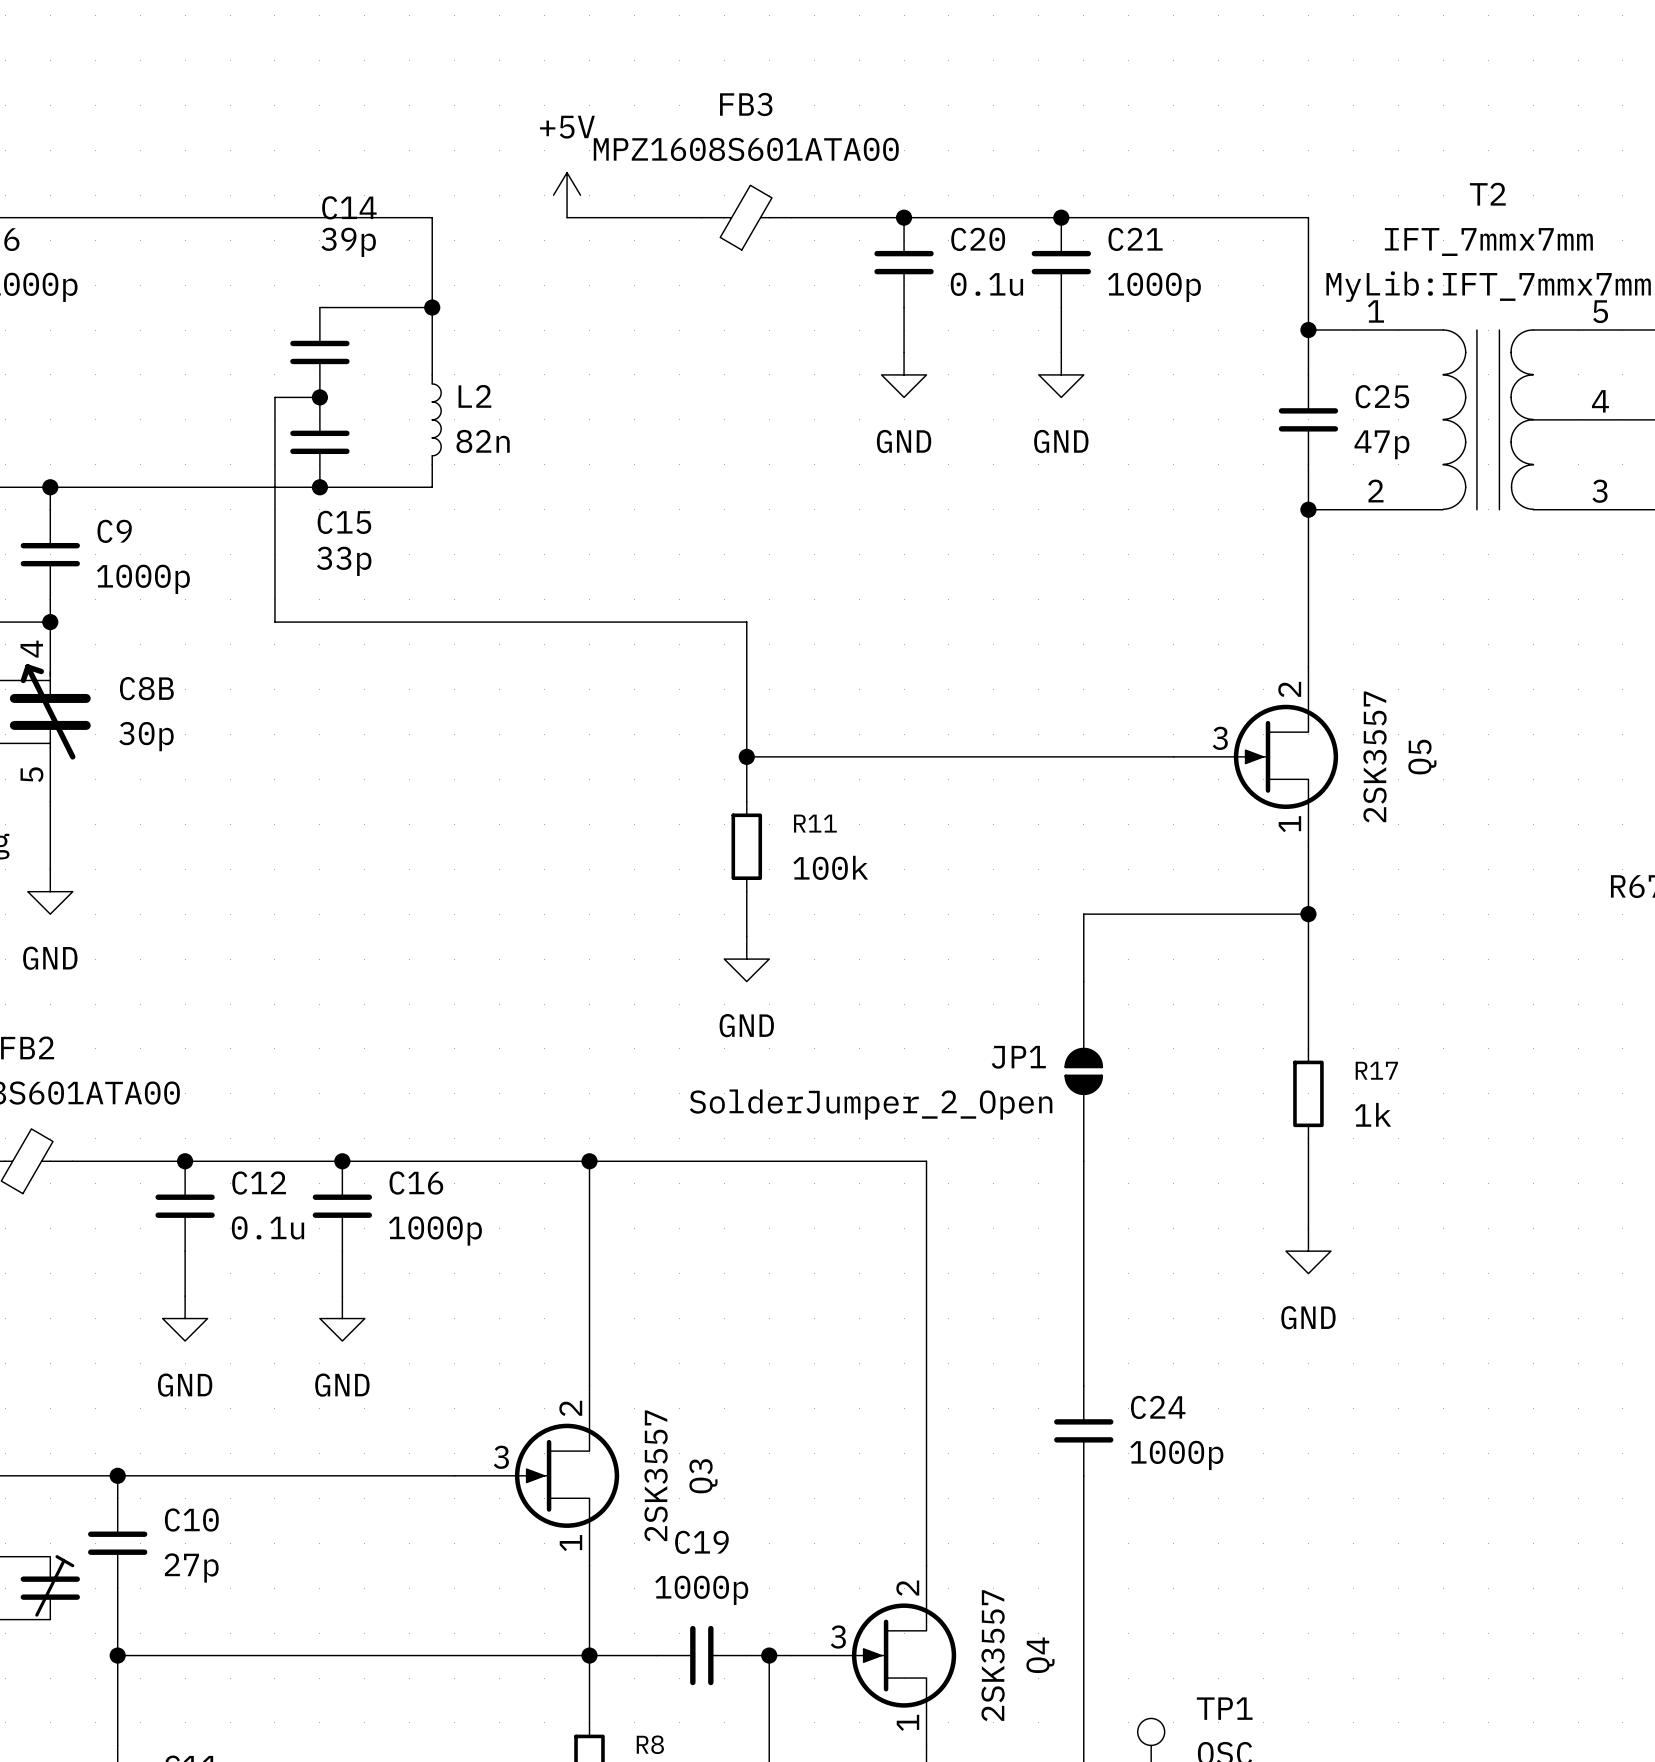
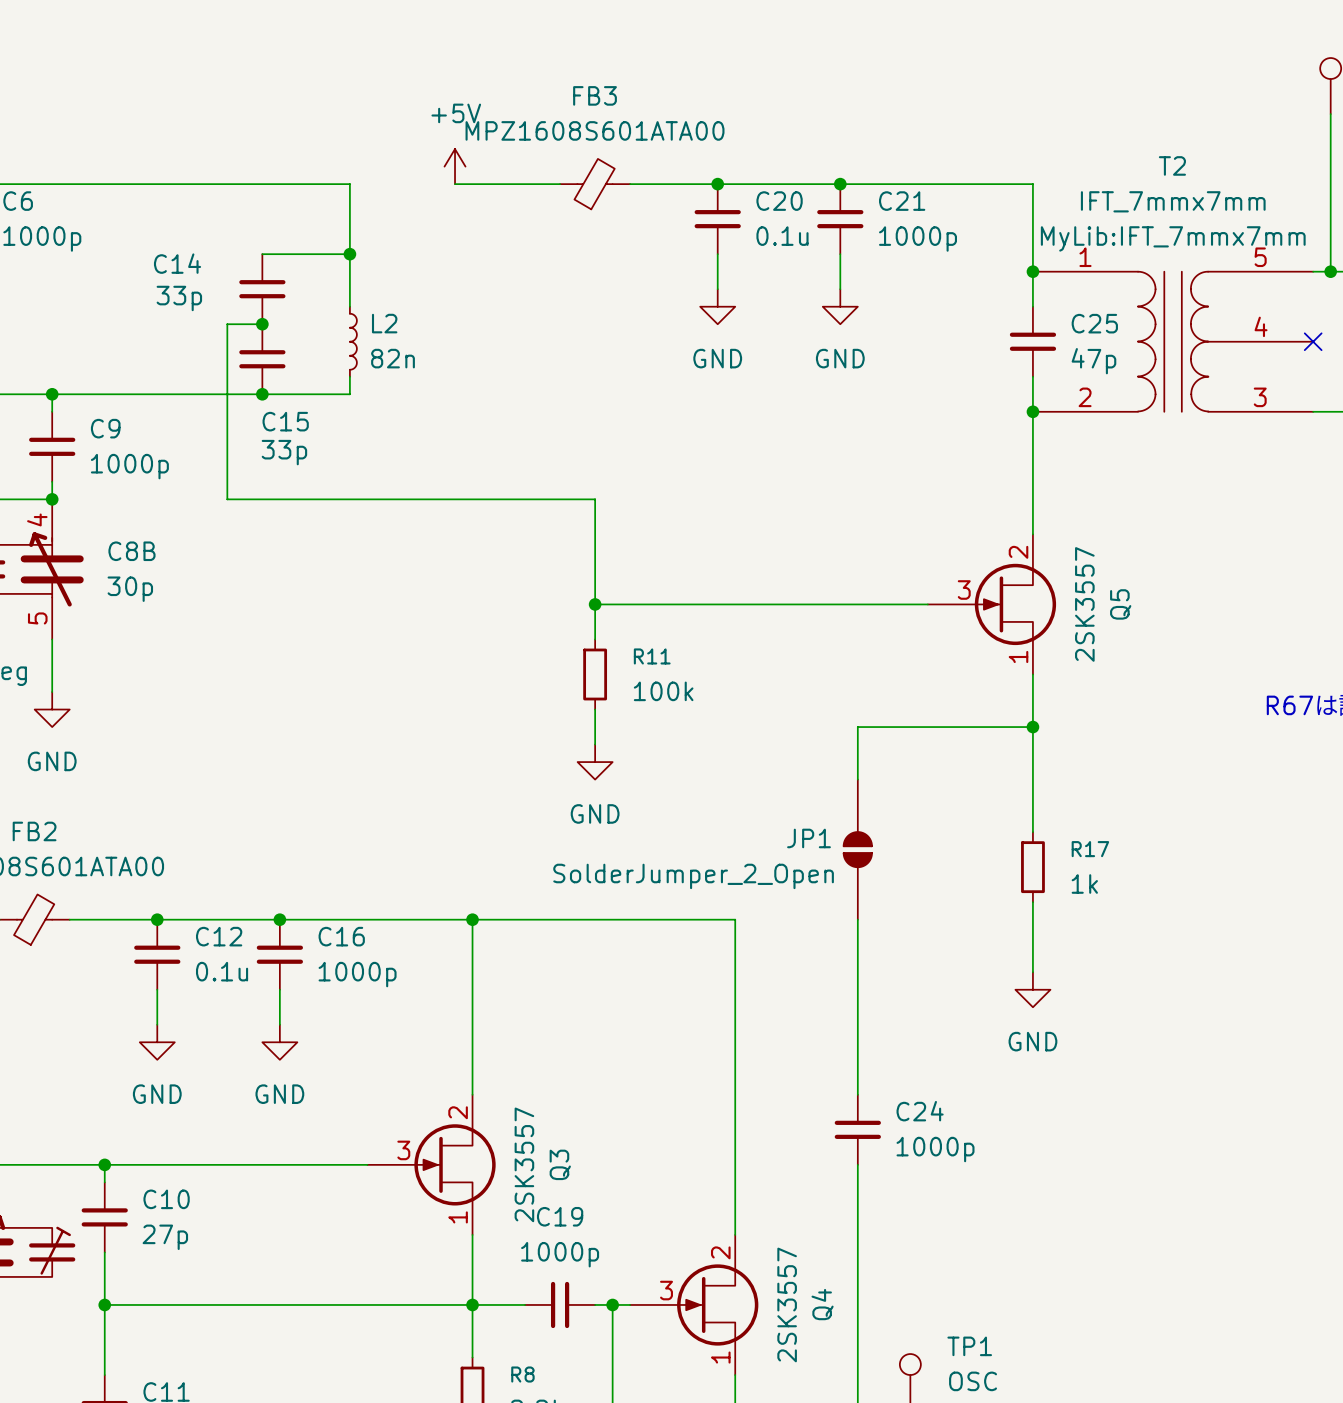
C14 name position: C14 (349, 207) -> C14 (177, 263)
C14 value: 39p (348, 242) -> 33p (179, 298)

